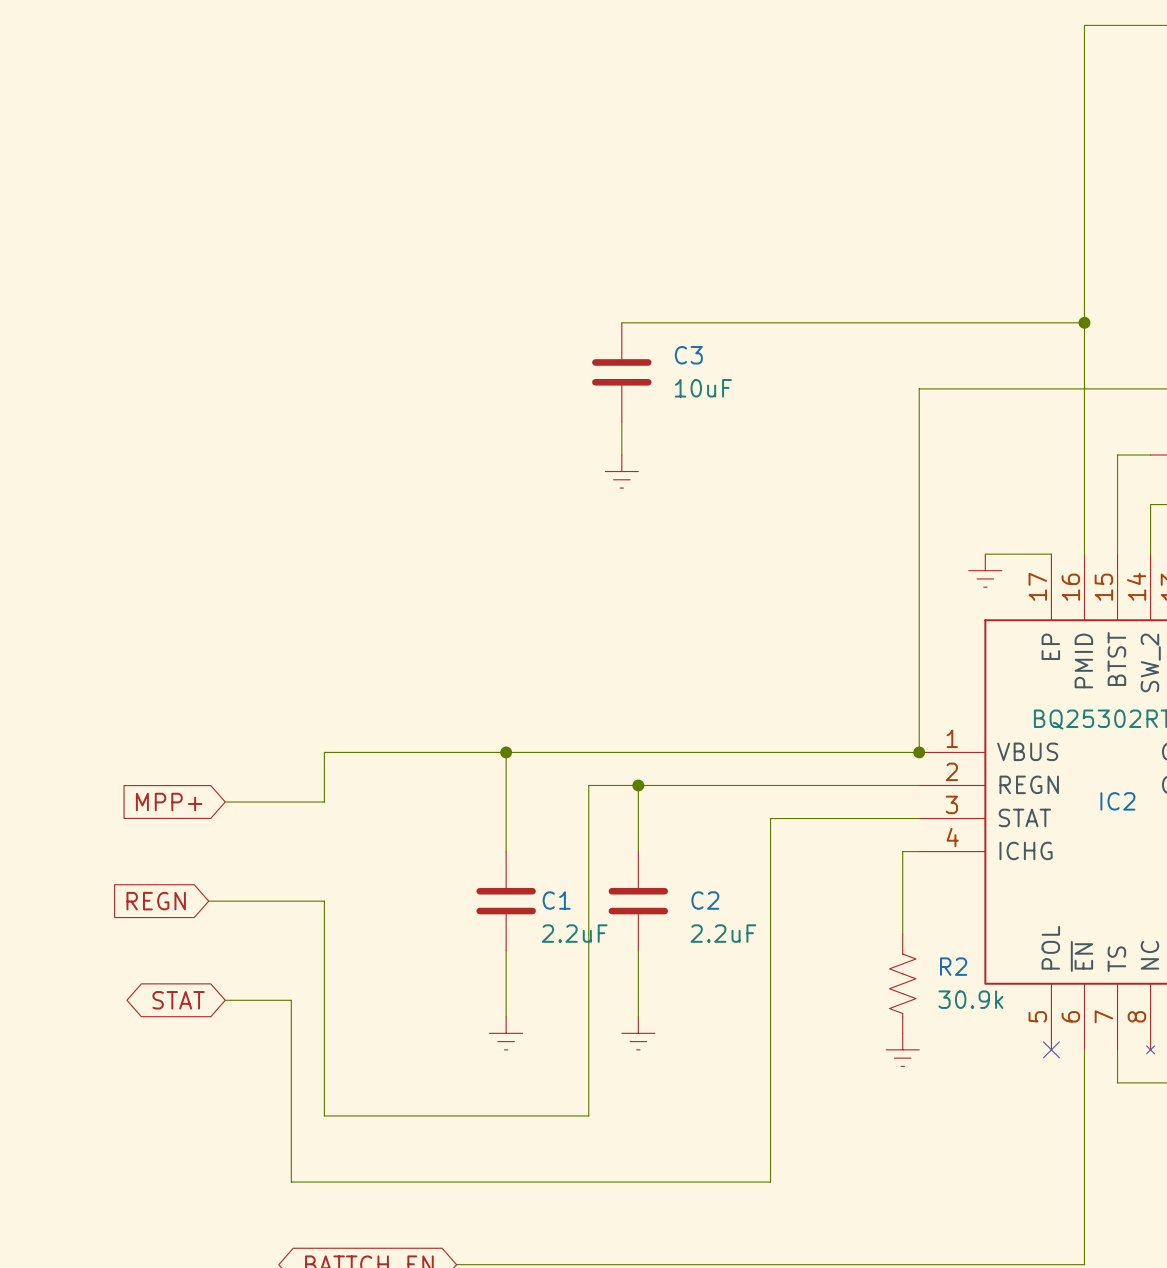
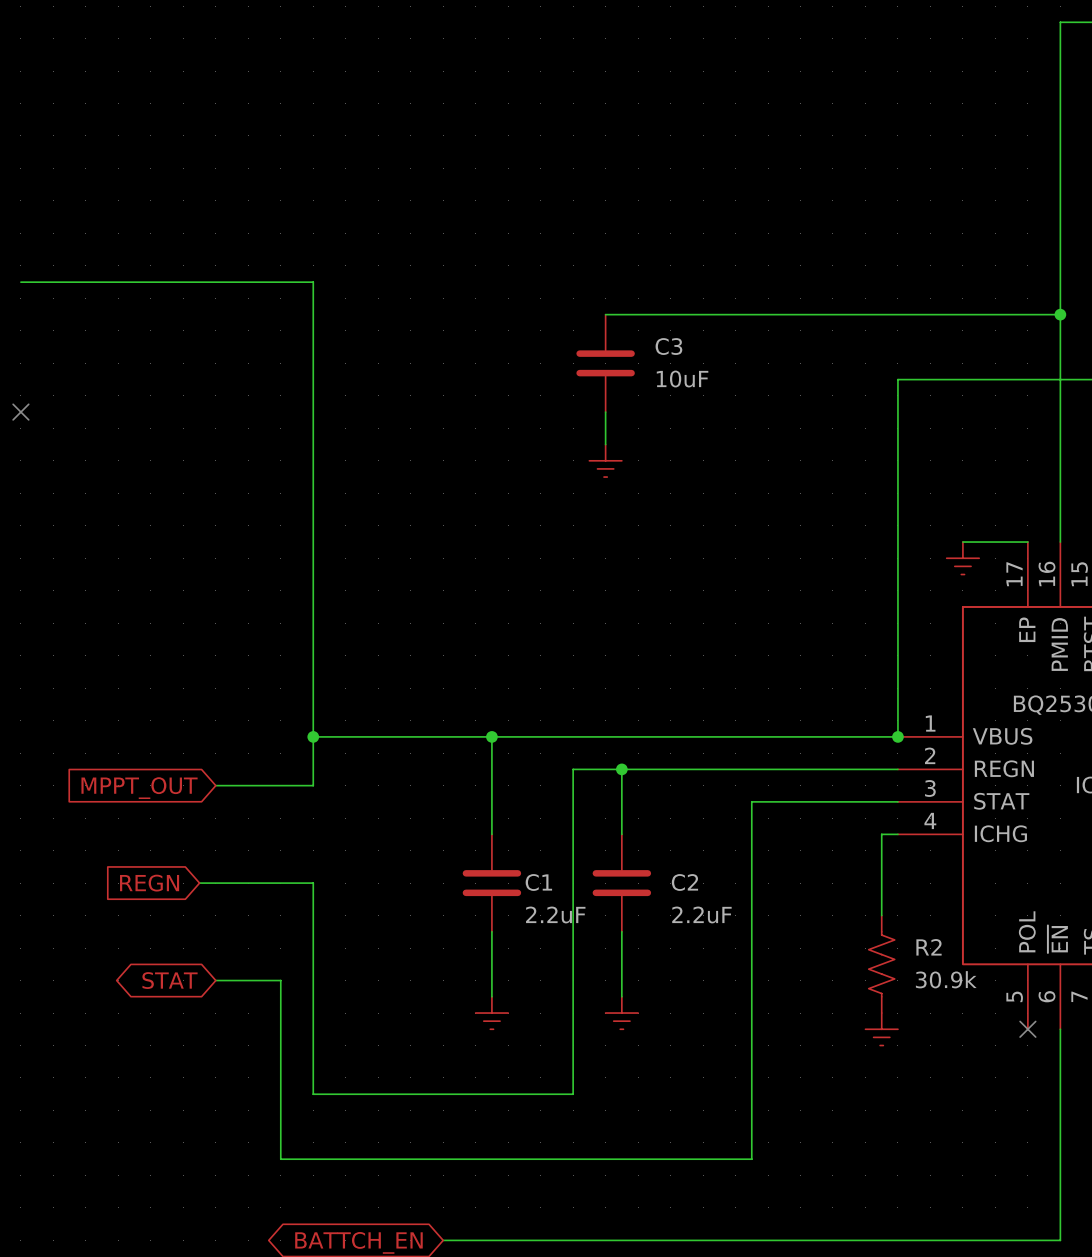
wire: none -> (20, 282) (313, 282) (313, 736)
no-connect mark: none -> (20, 412)
junction: none -> (313, 736)
global label: MPP+ (169, 802) -> MPPT_OUT (139, 788)

